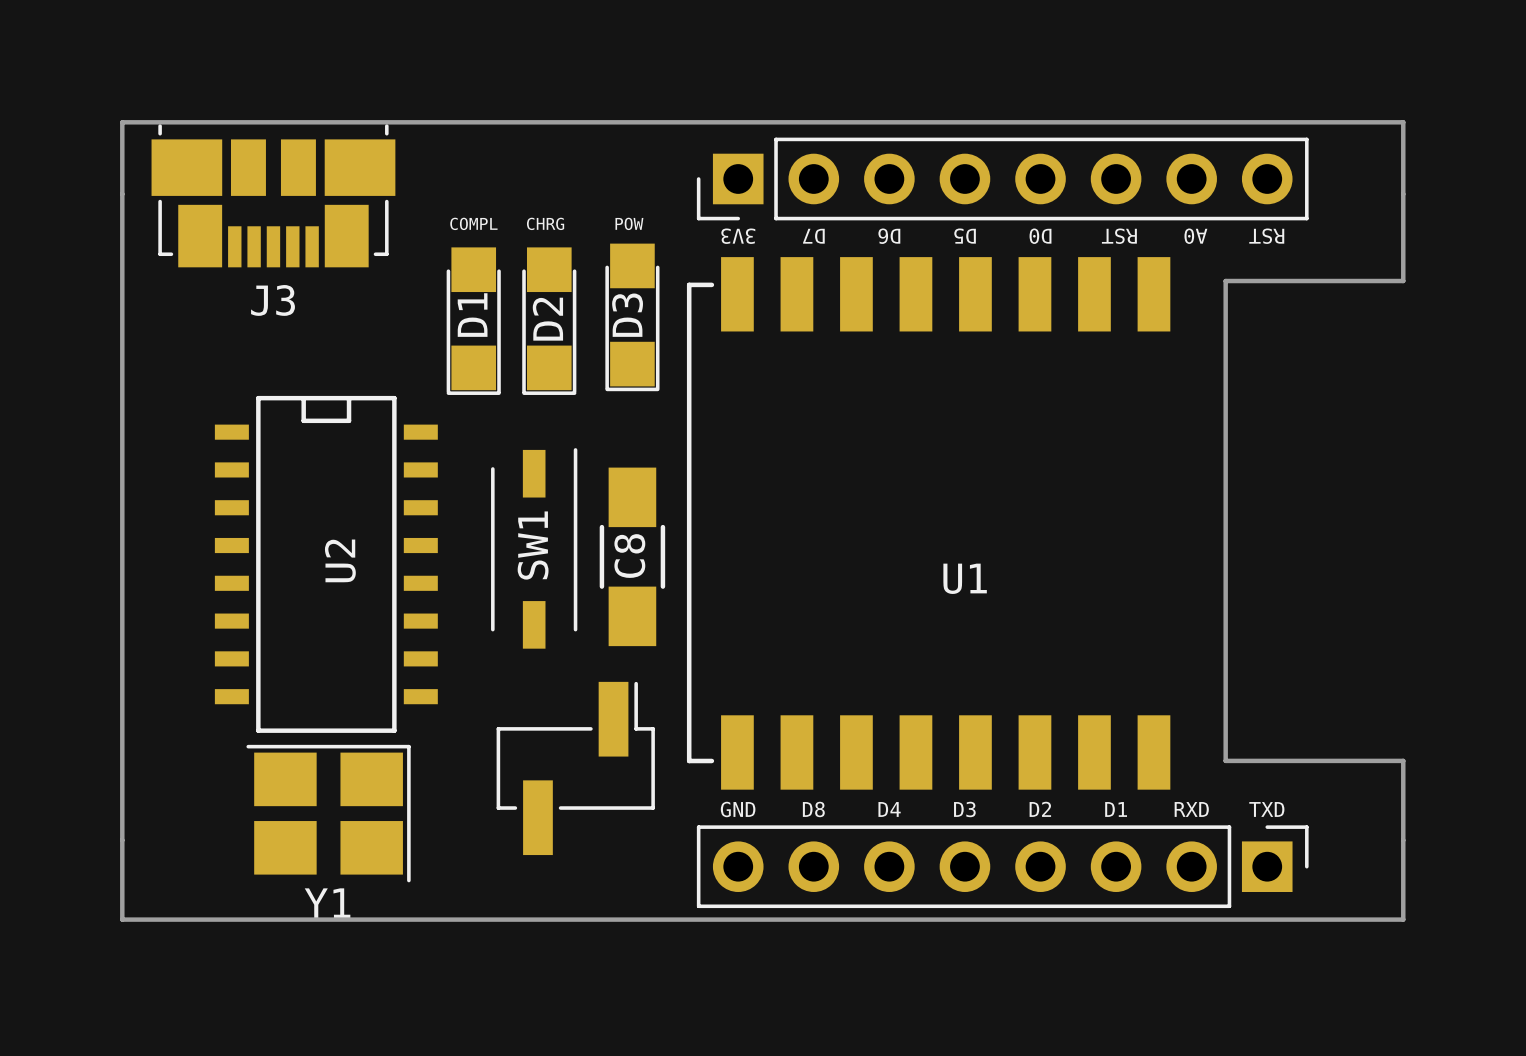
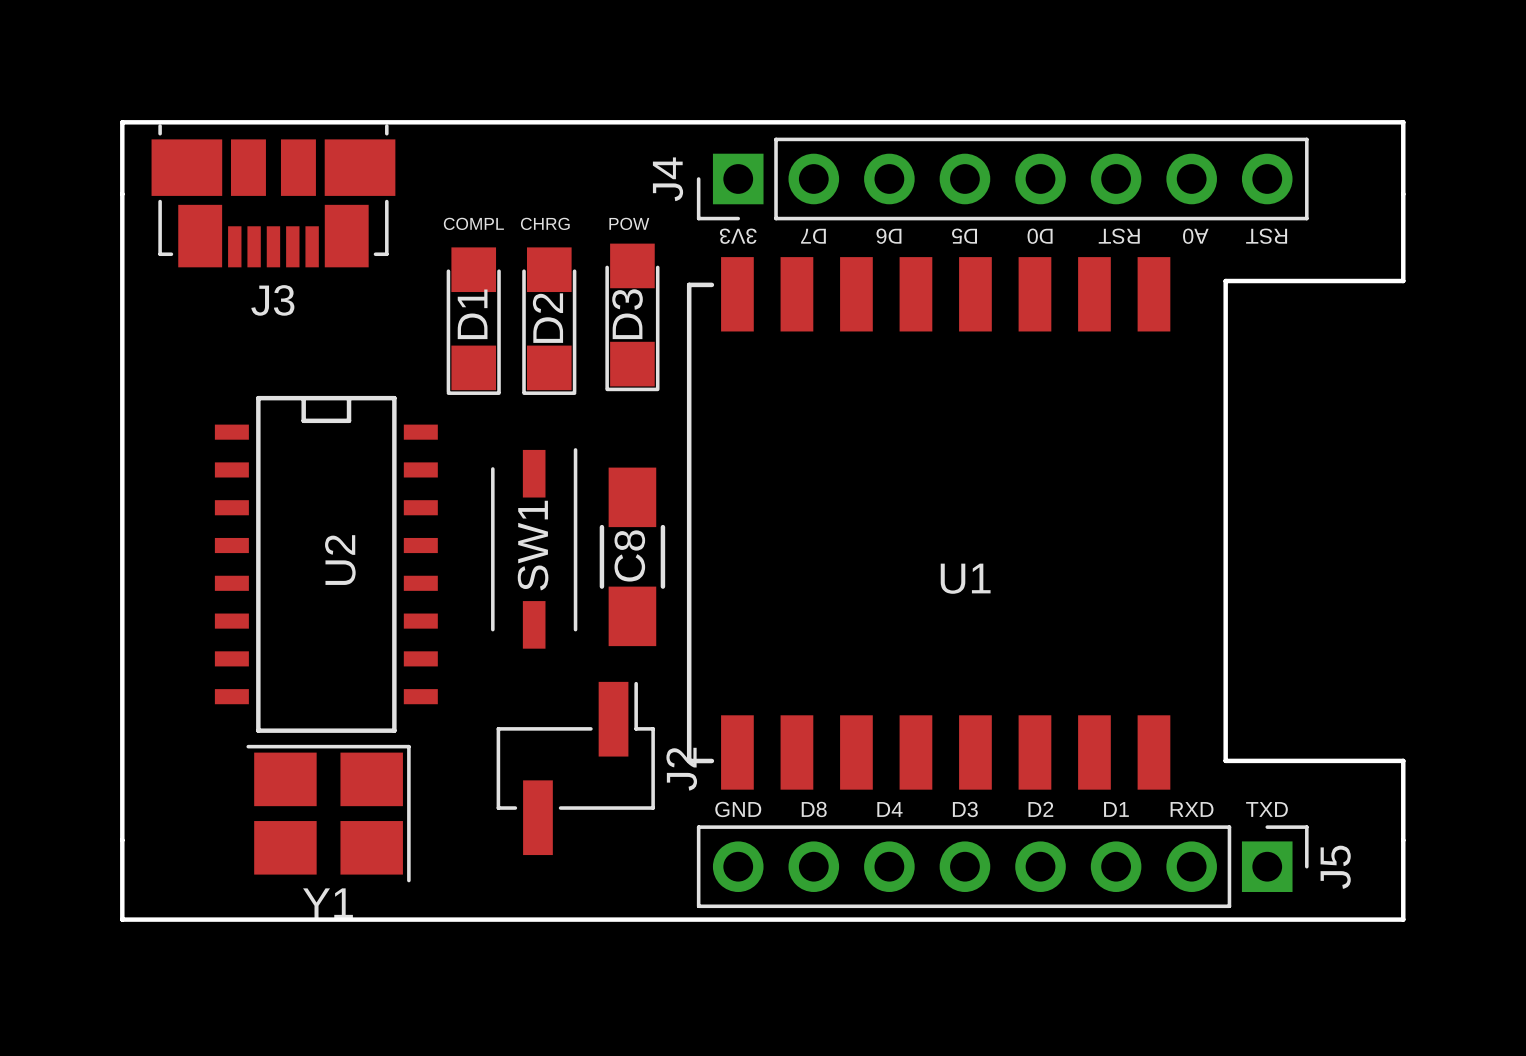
J4 name: none -> J4 (668, 179)
J2 name: none -> J2 (681, 769)
J5 name: none -> J5 (1335, 867)

